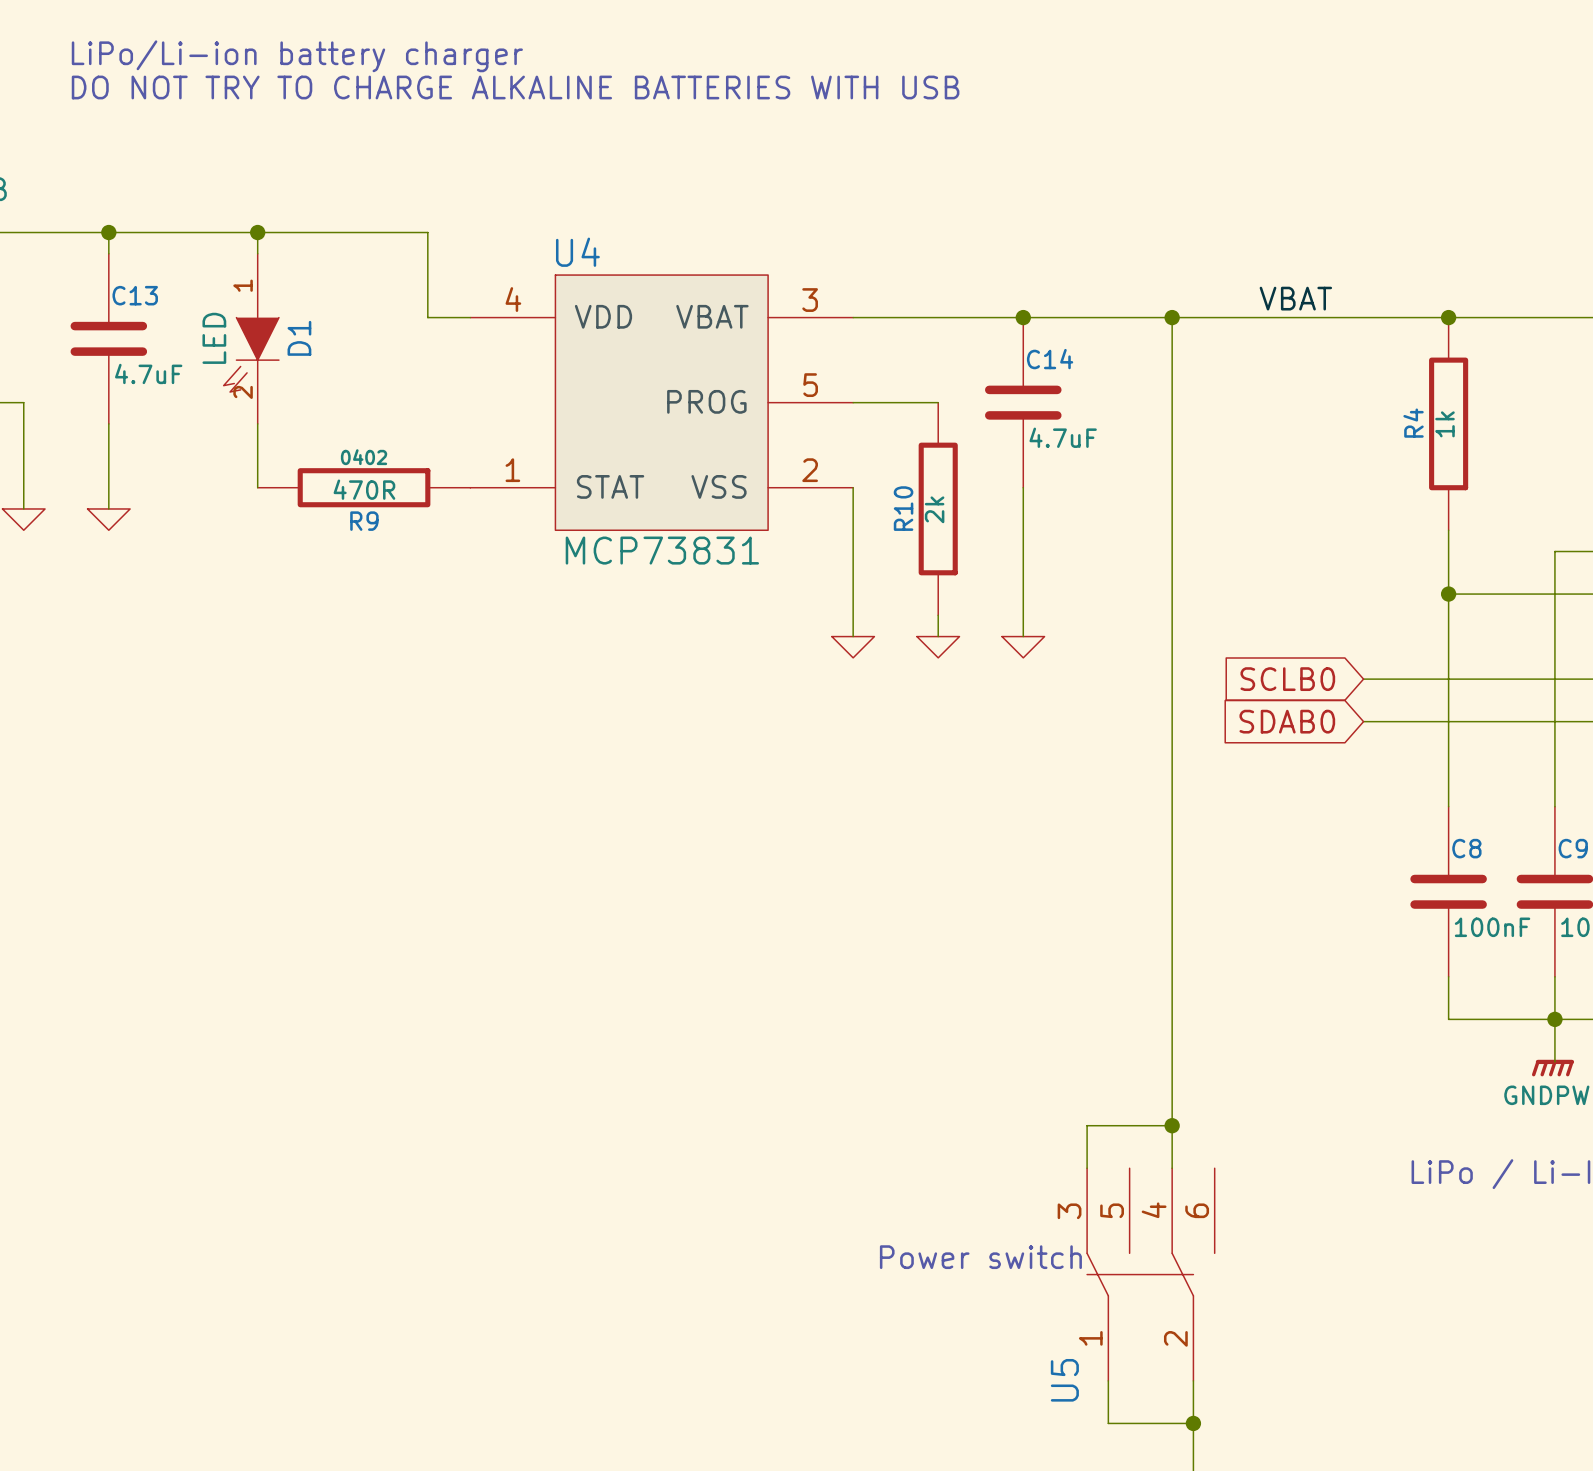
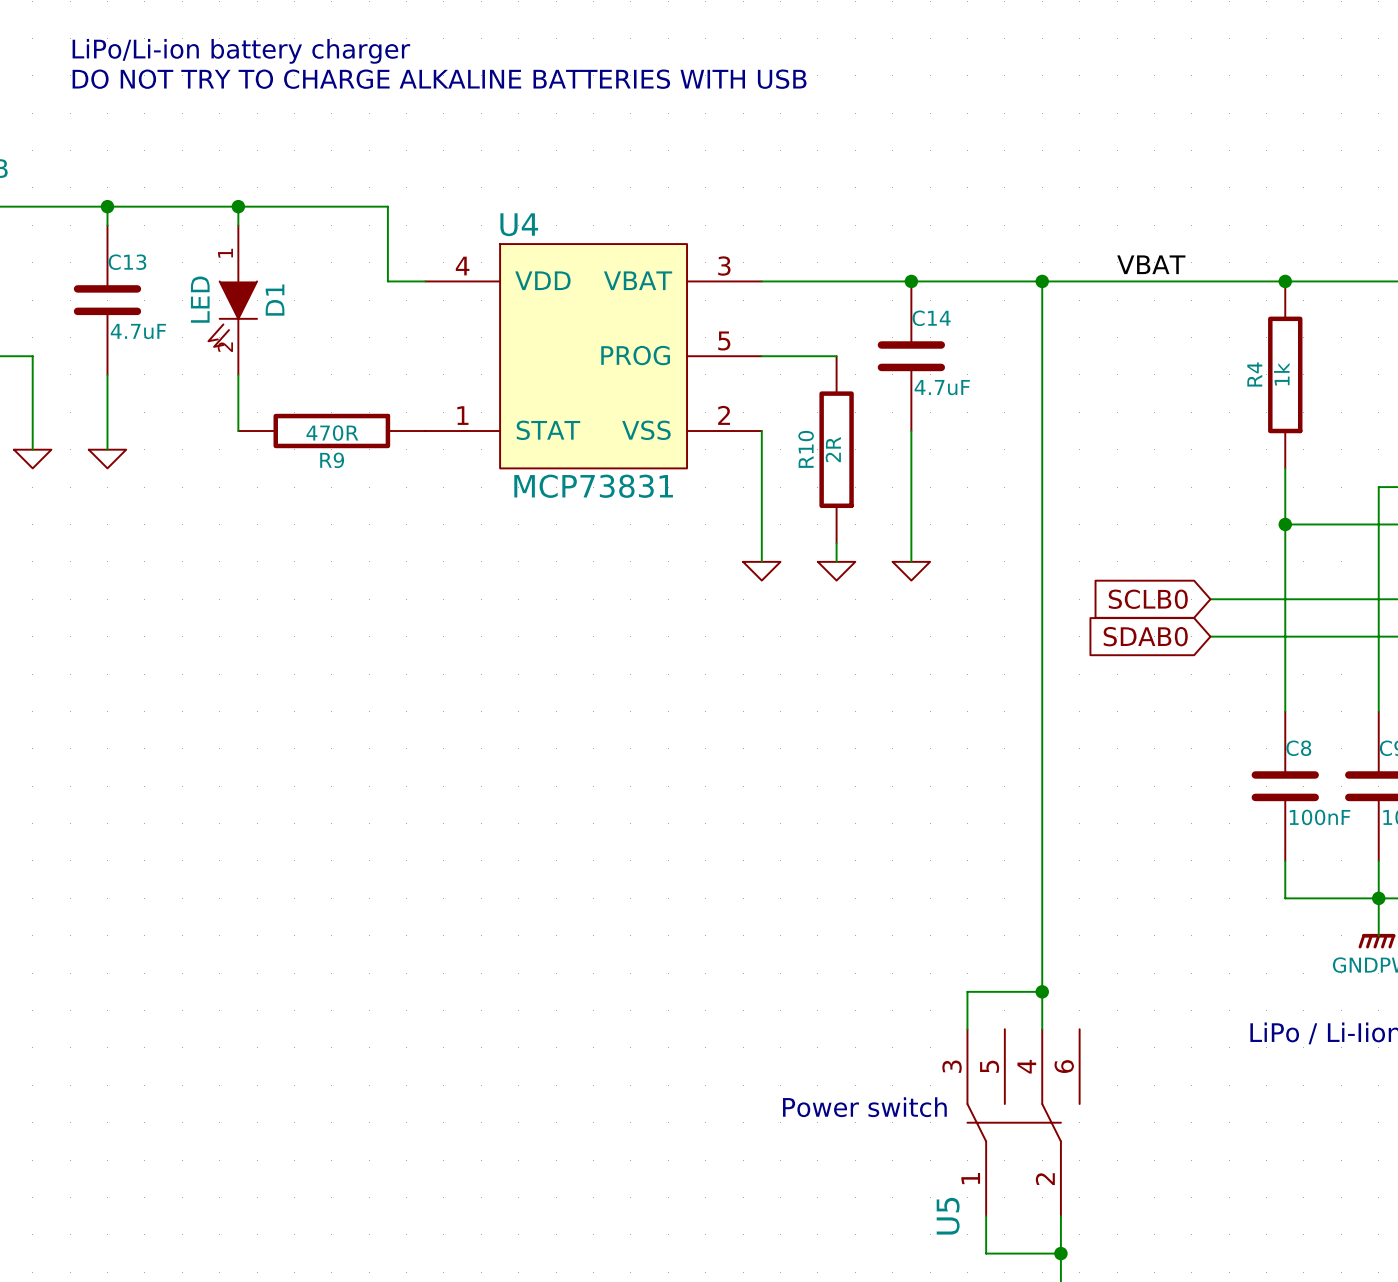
R9 text: 0402 (364, 457) -> none
R10 value: 2k (934, 509) -> 2R (833, 449)

